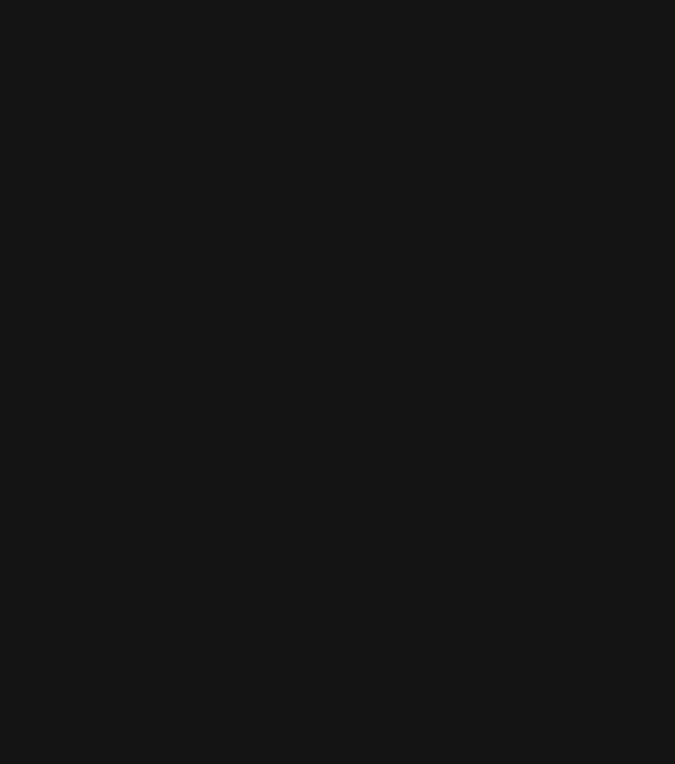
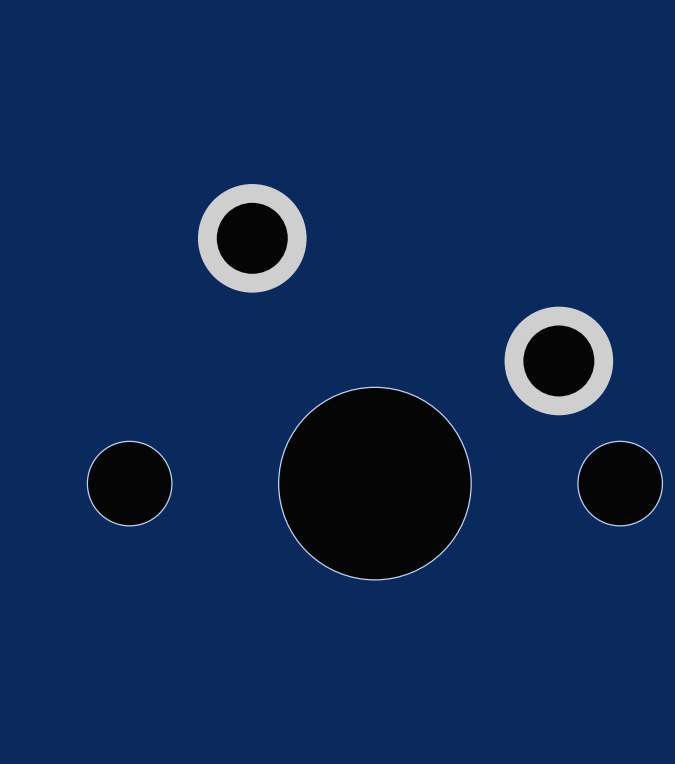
part: none -> (374, 381)

